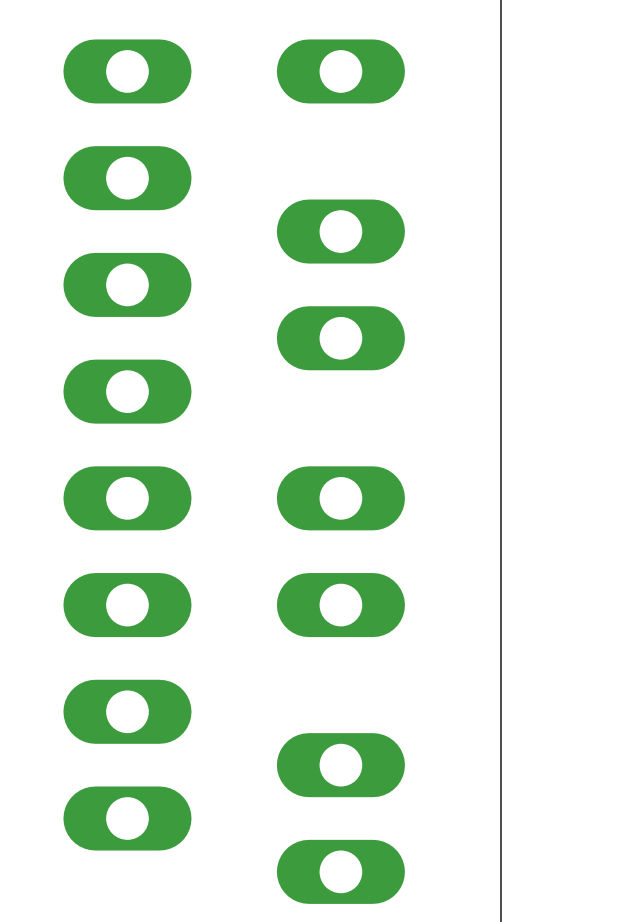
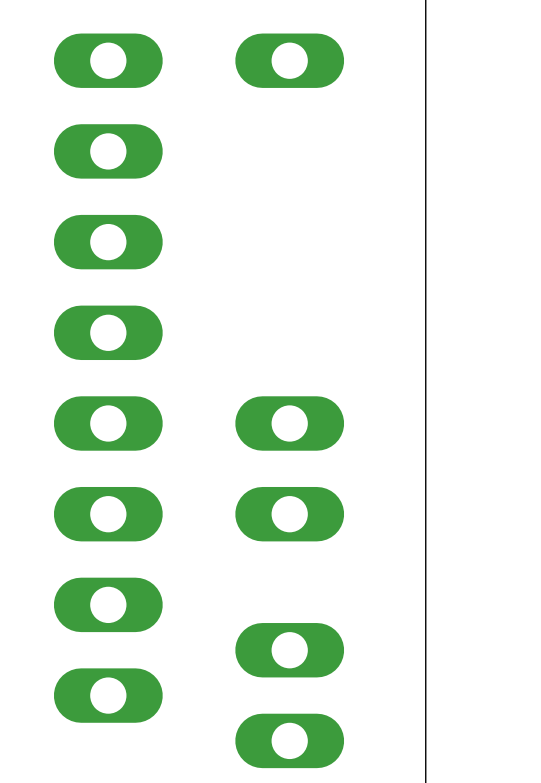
part: (340, 284) -> none

